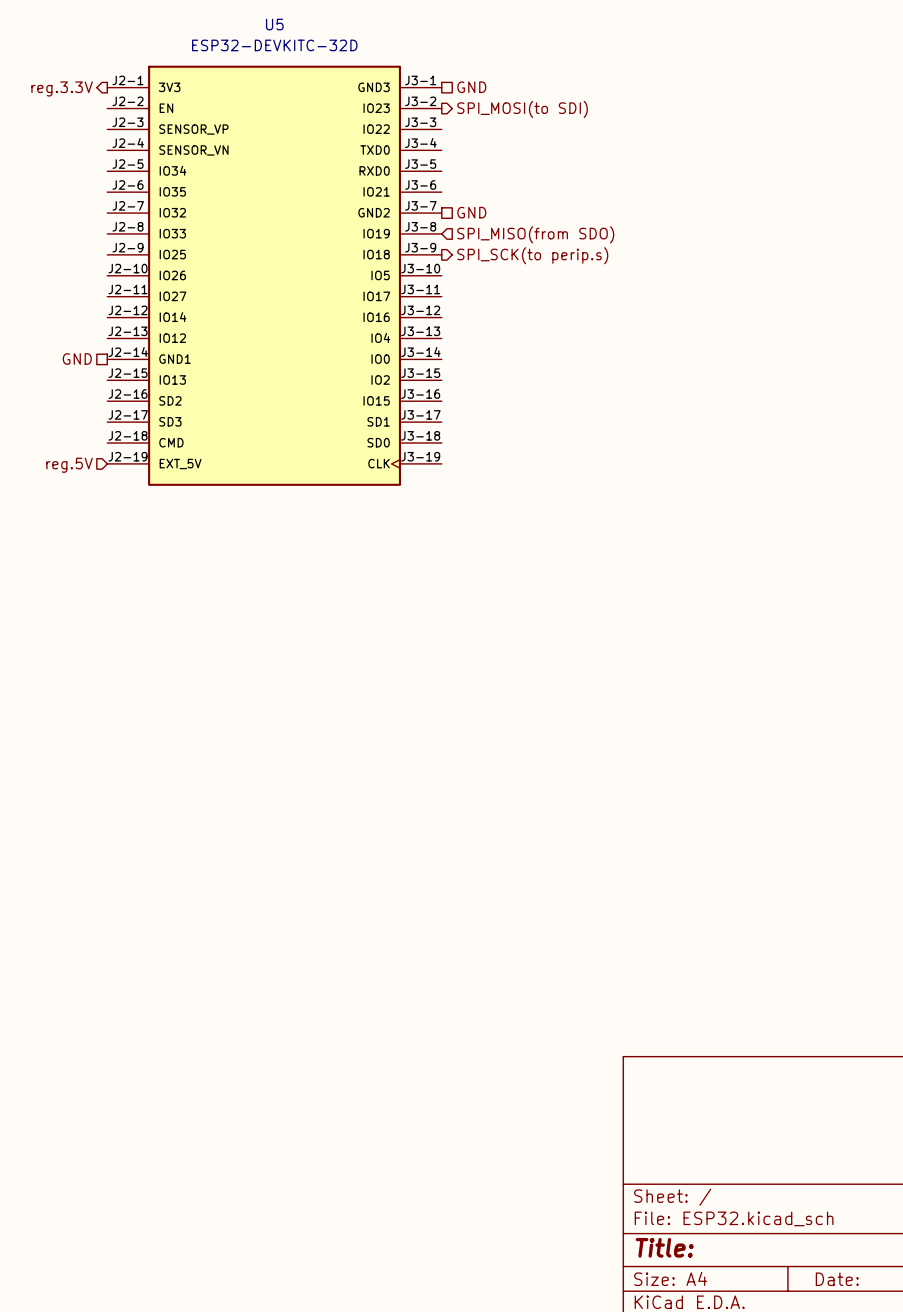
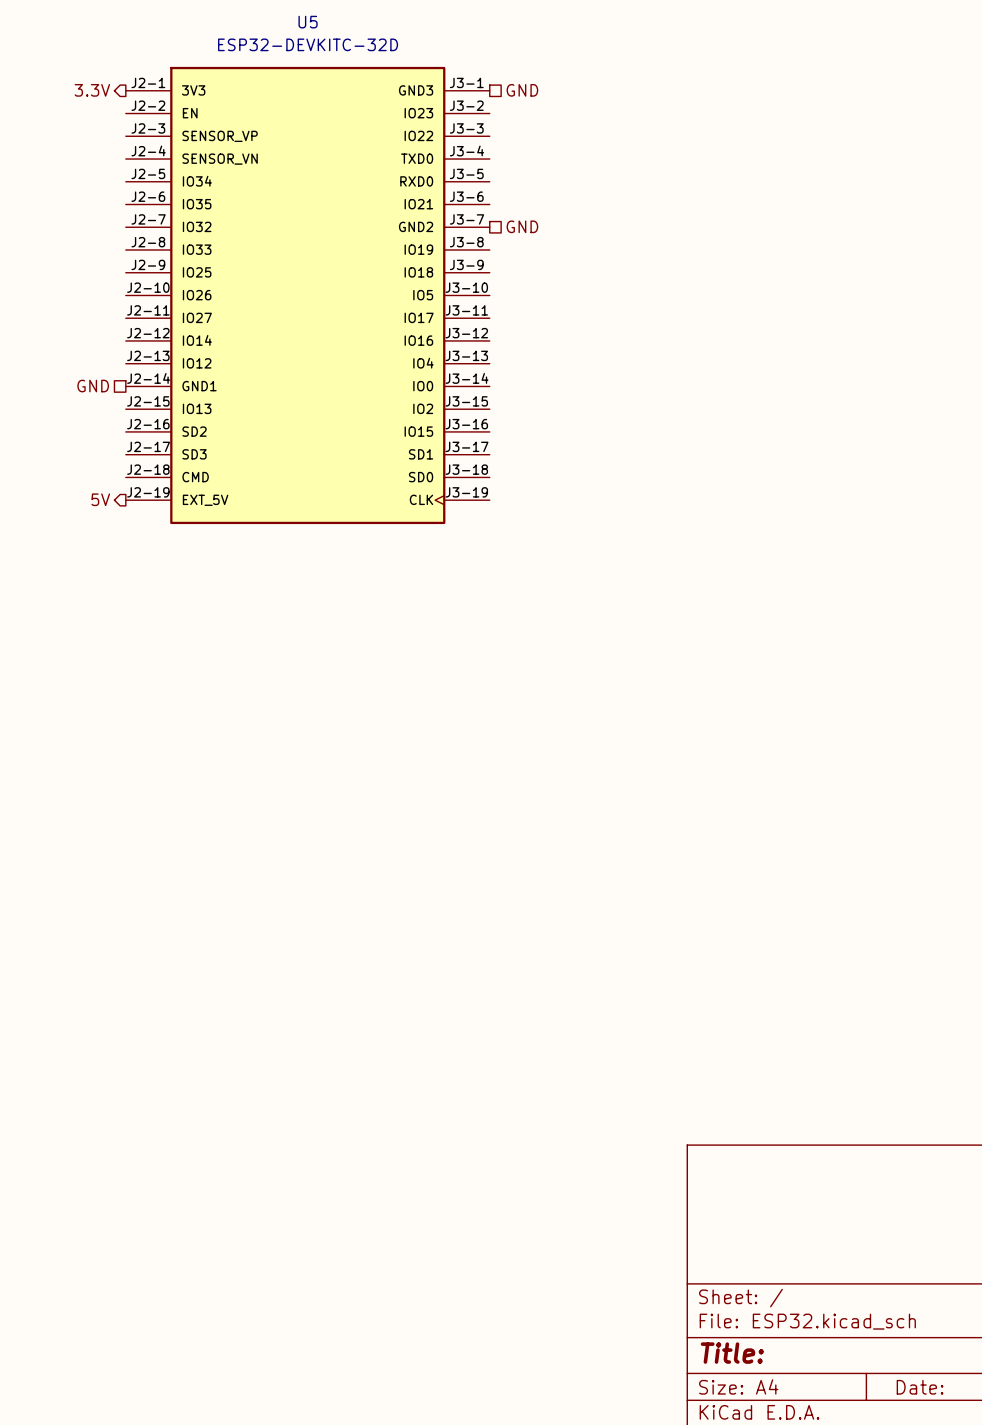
hierarchical label: reg.3.3V (62, 88) -> 3.3V (92, 90)
hierarchical label: SPI_MOSI(to SDI) (522, 109) -> none
hierarchical label: SPI_MISO(from SDO) (535, 234) -> none
hierarchical label: SPI_SCK(to perip.s) (532, 255) -> none
hierarchical label shape: input (69, 465) -> output (100, 499)
hierarchical label: reg.5V (69, 465) -> 5V (100, 499)

